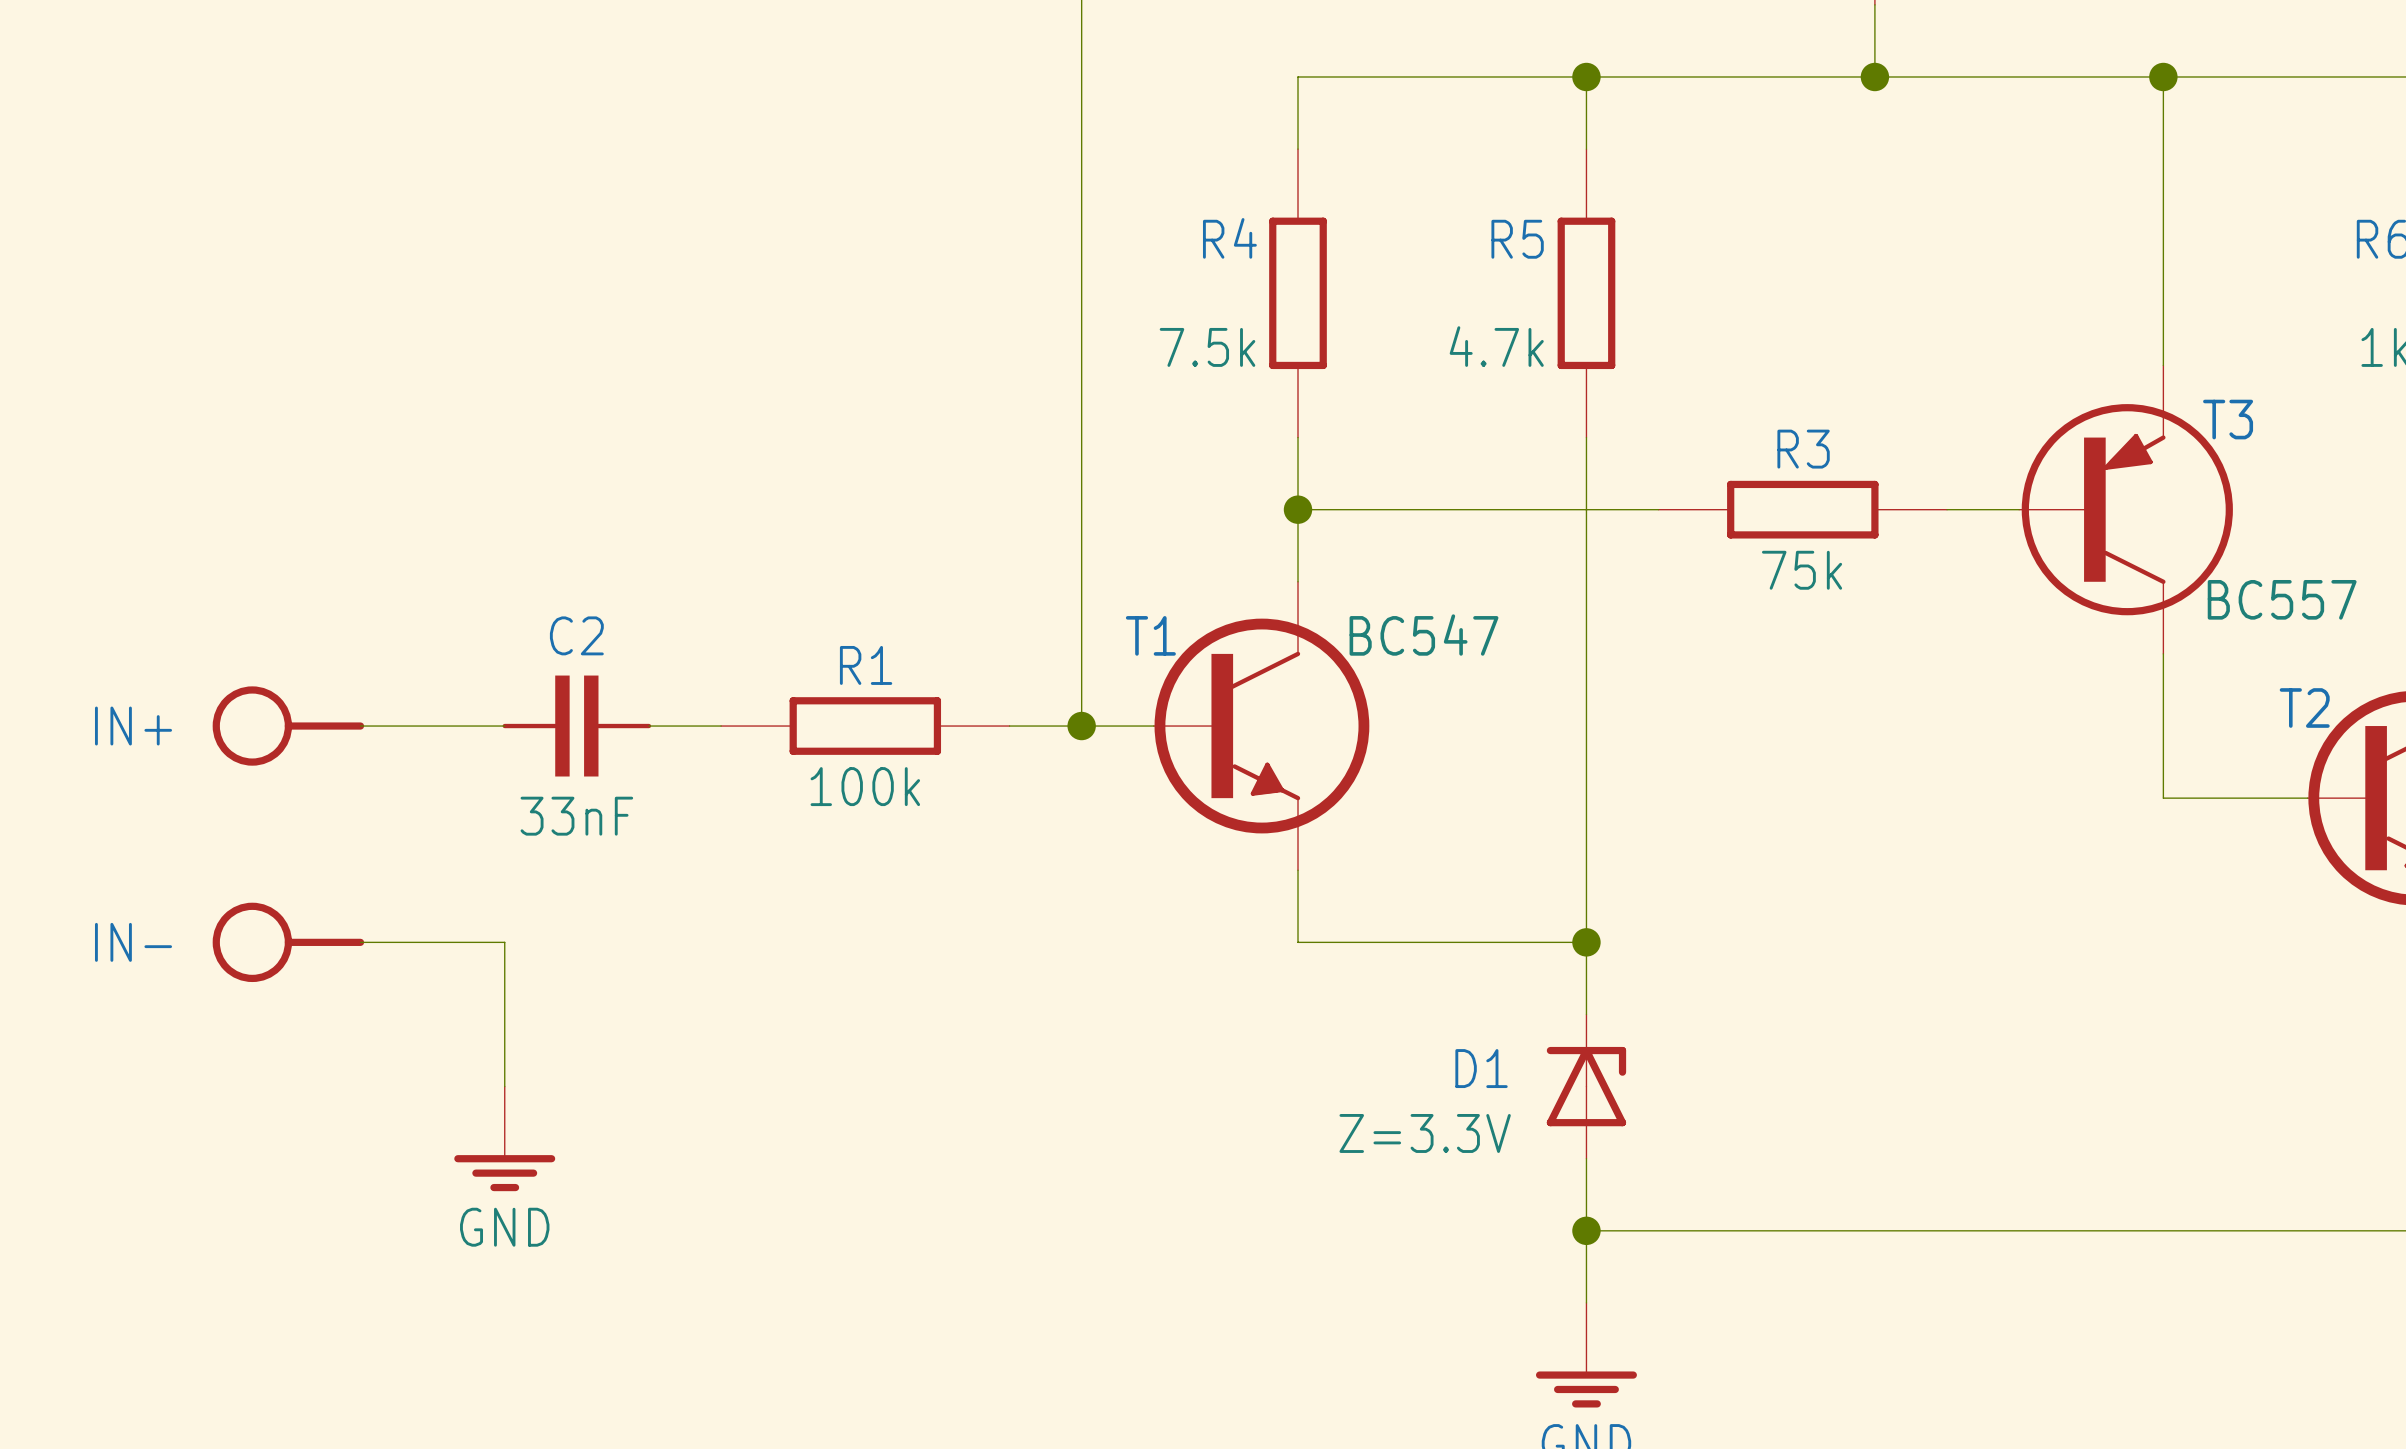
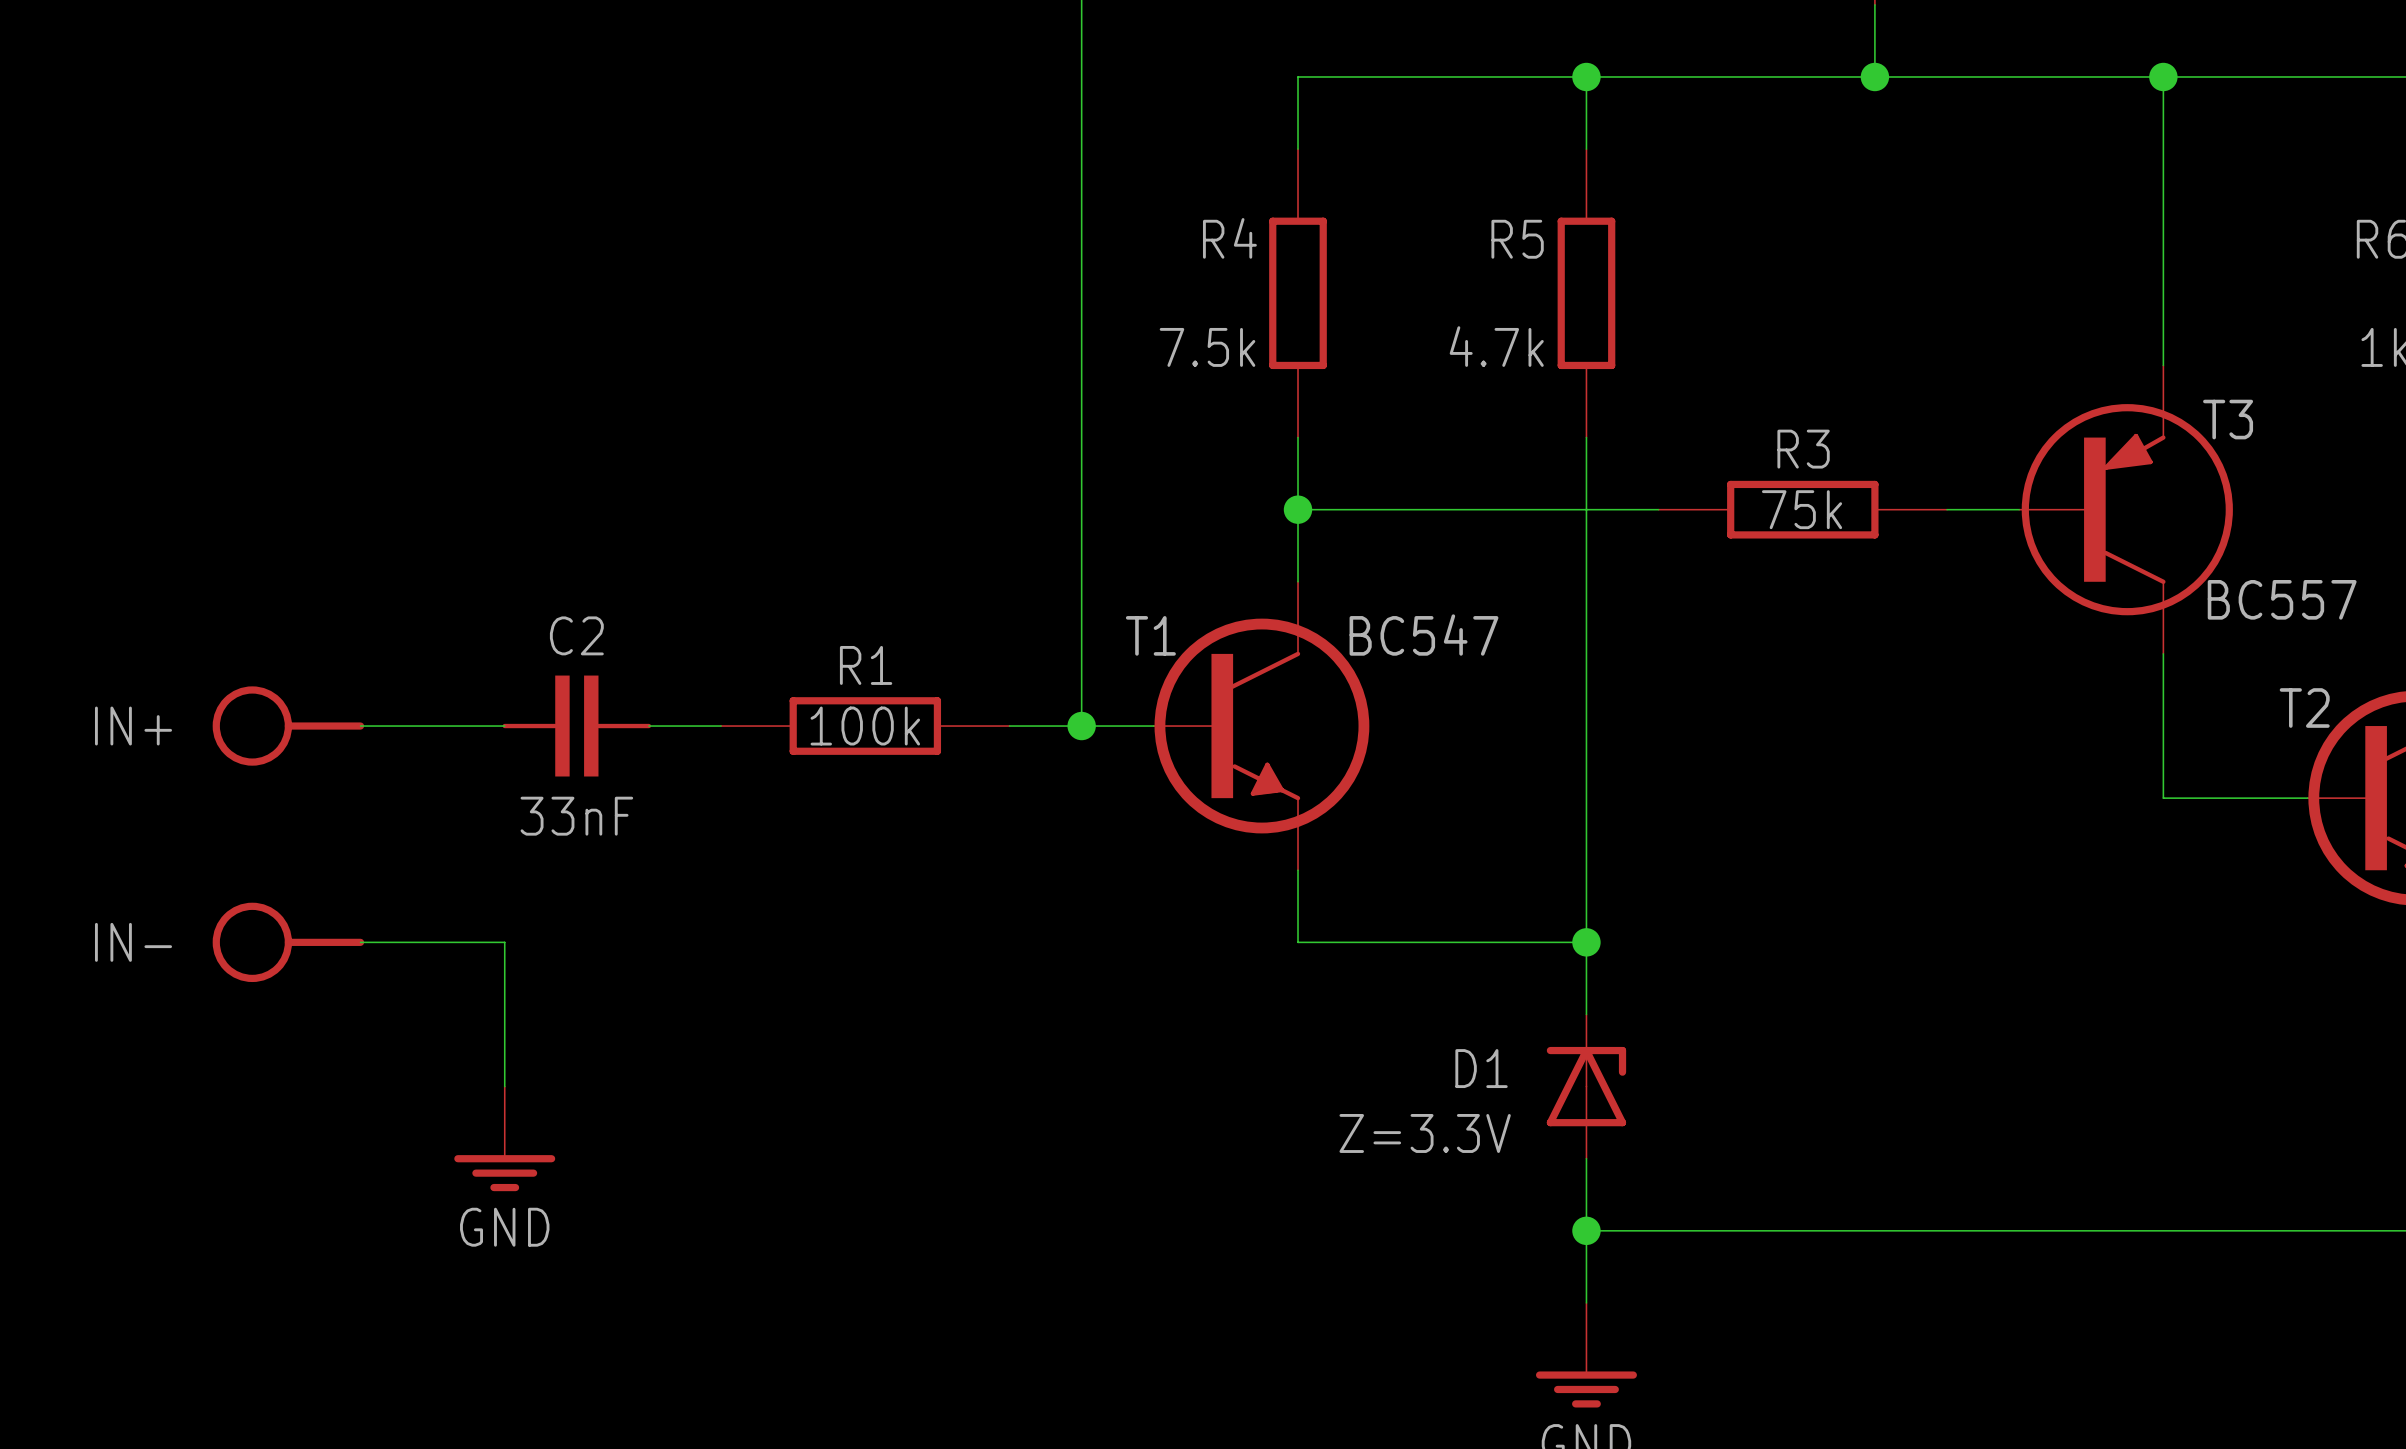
R3 value position: 75k (1802, 570) -> 75k (1802, 509)
R1 value position: 100k (865, 786) -> 100k (865, 726)

